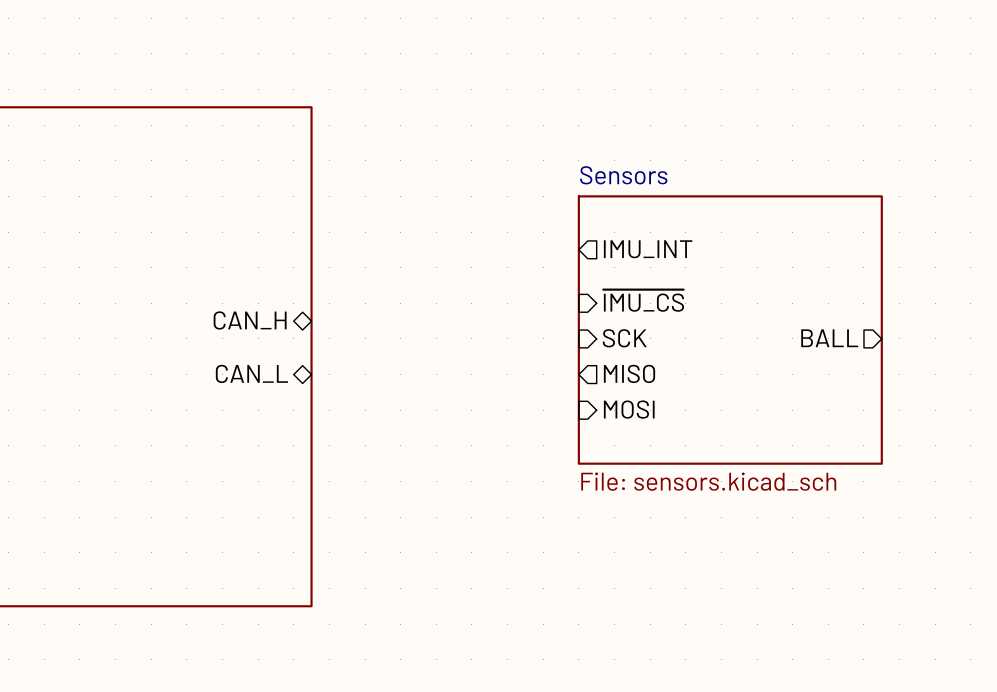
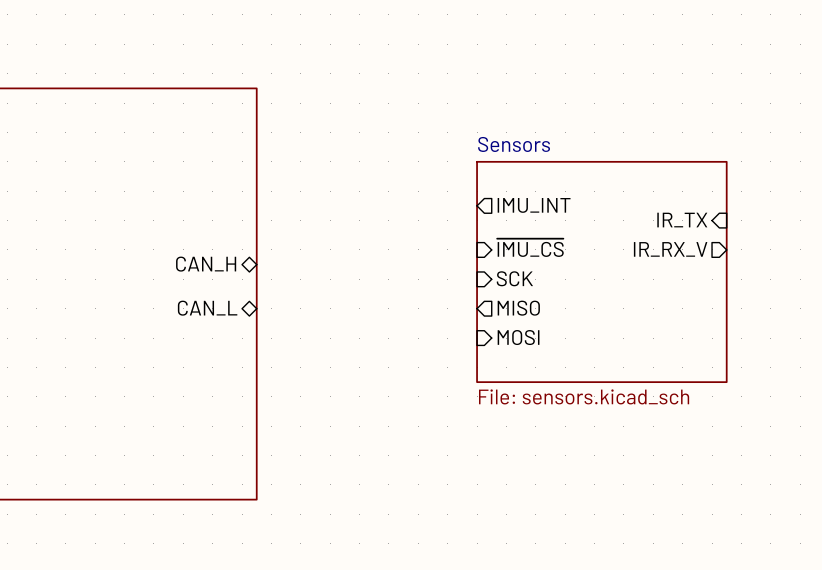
sheet pin: none -> IR_TX (682, 220)
sheet pin: none -> IR_RX_V (670, 249)
sheet pin: BALL (829, 338) -> none

